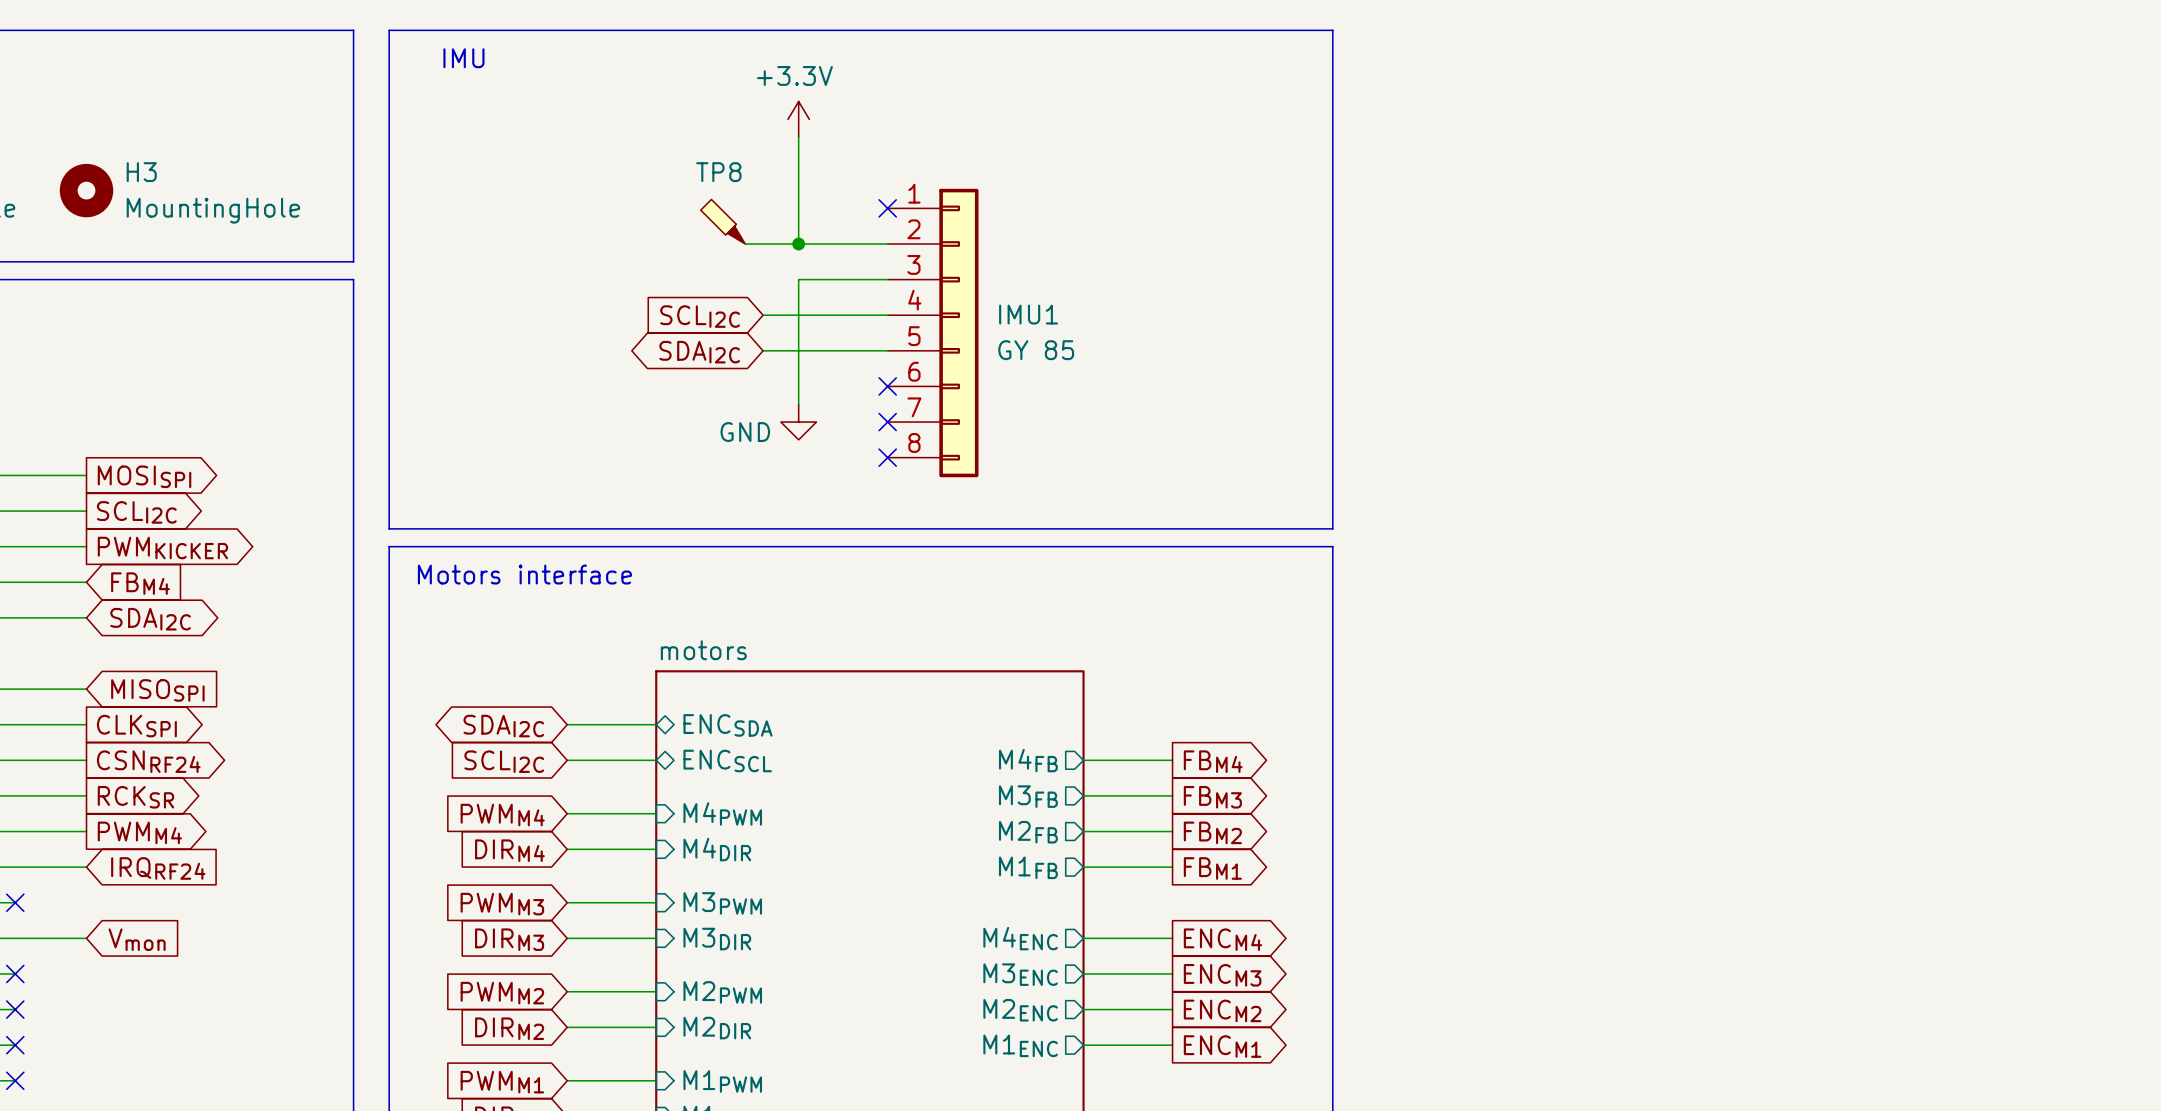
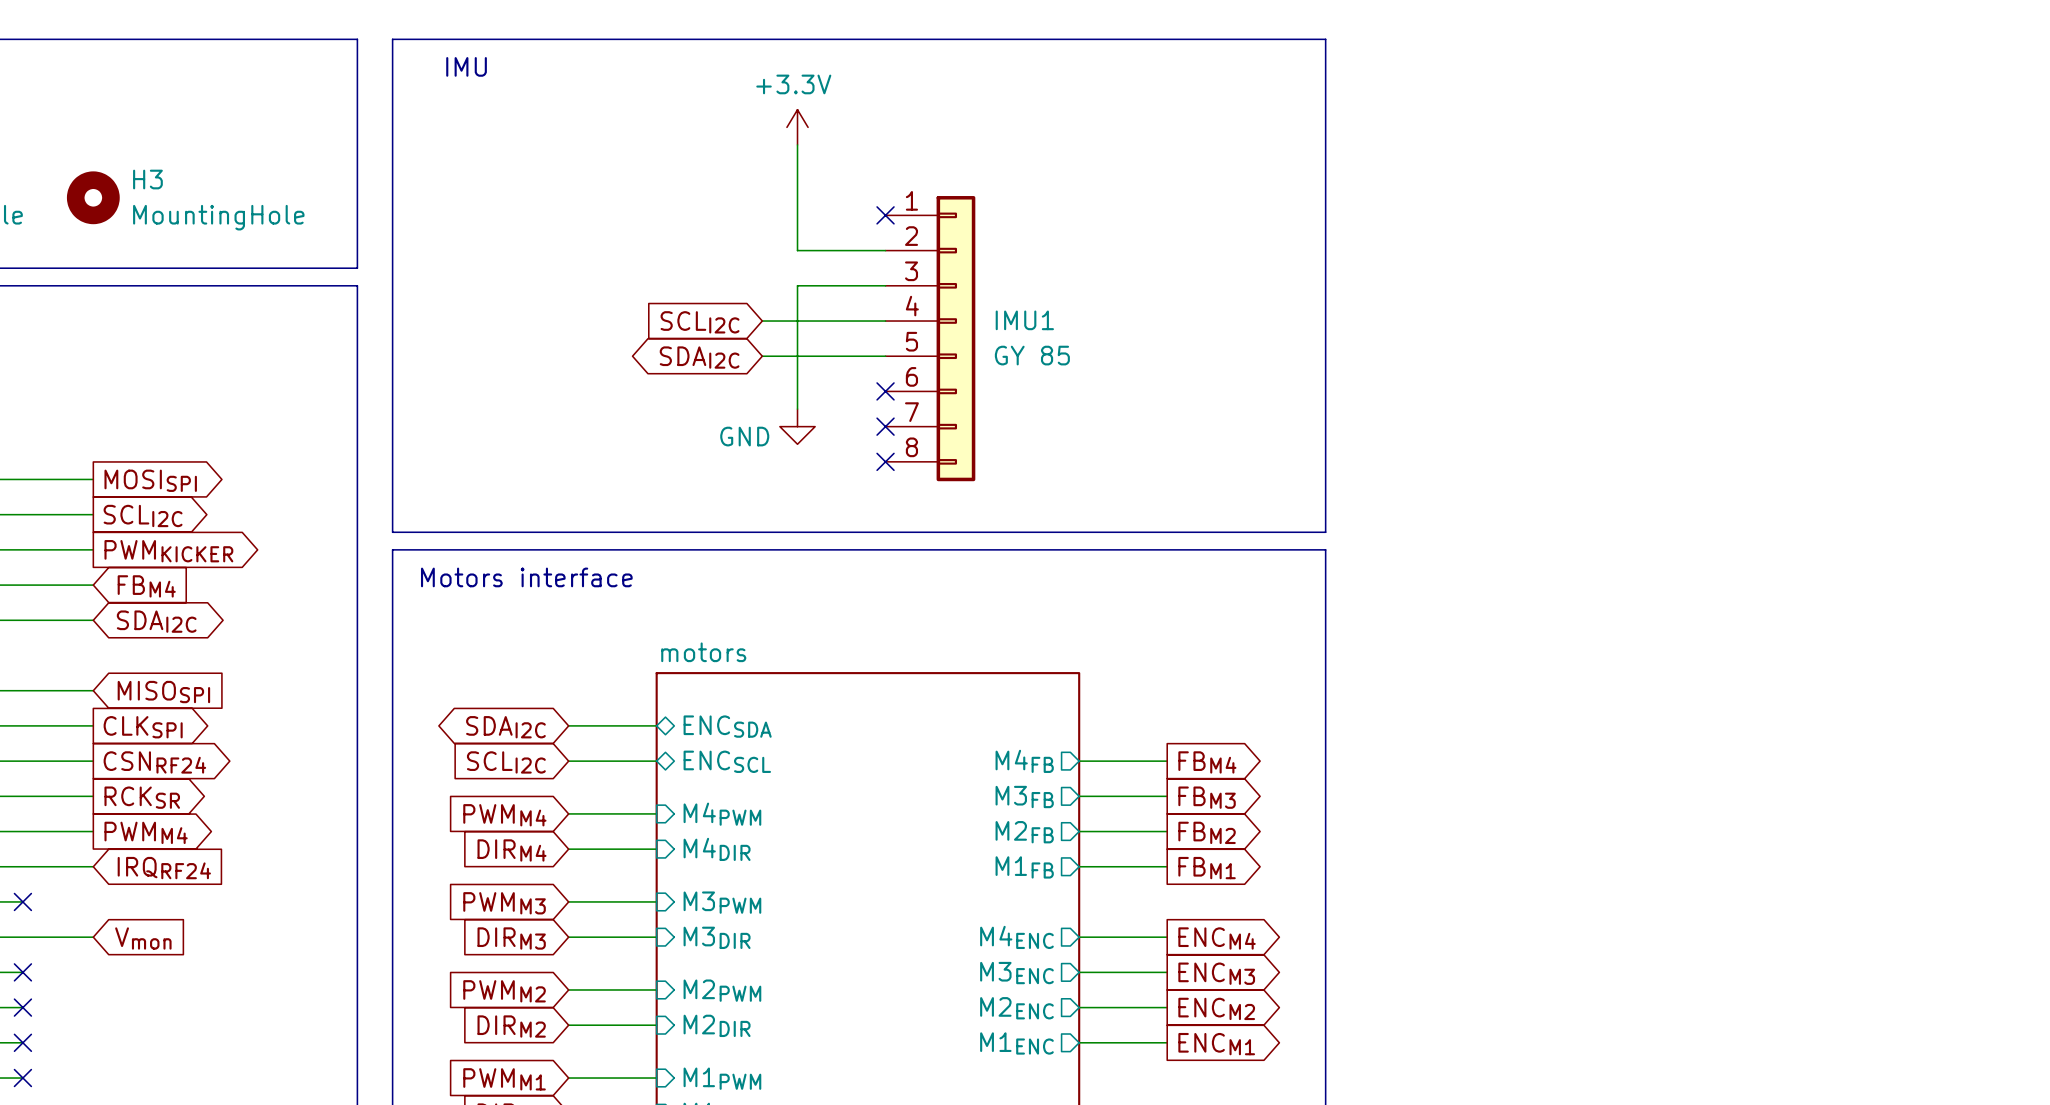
TP8: (723, 221) -> none
wire: (745, 244) (798, 244) -> none
junction: (798, 244) -> none

